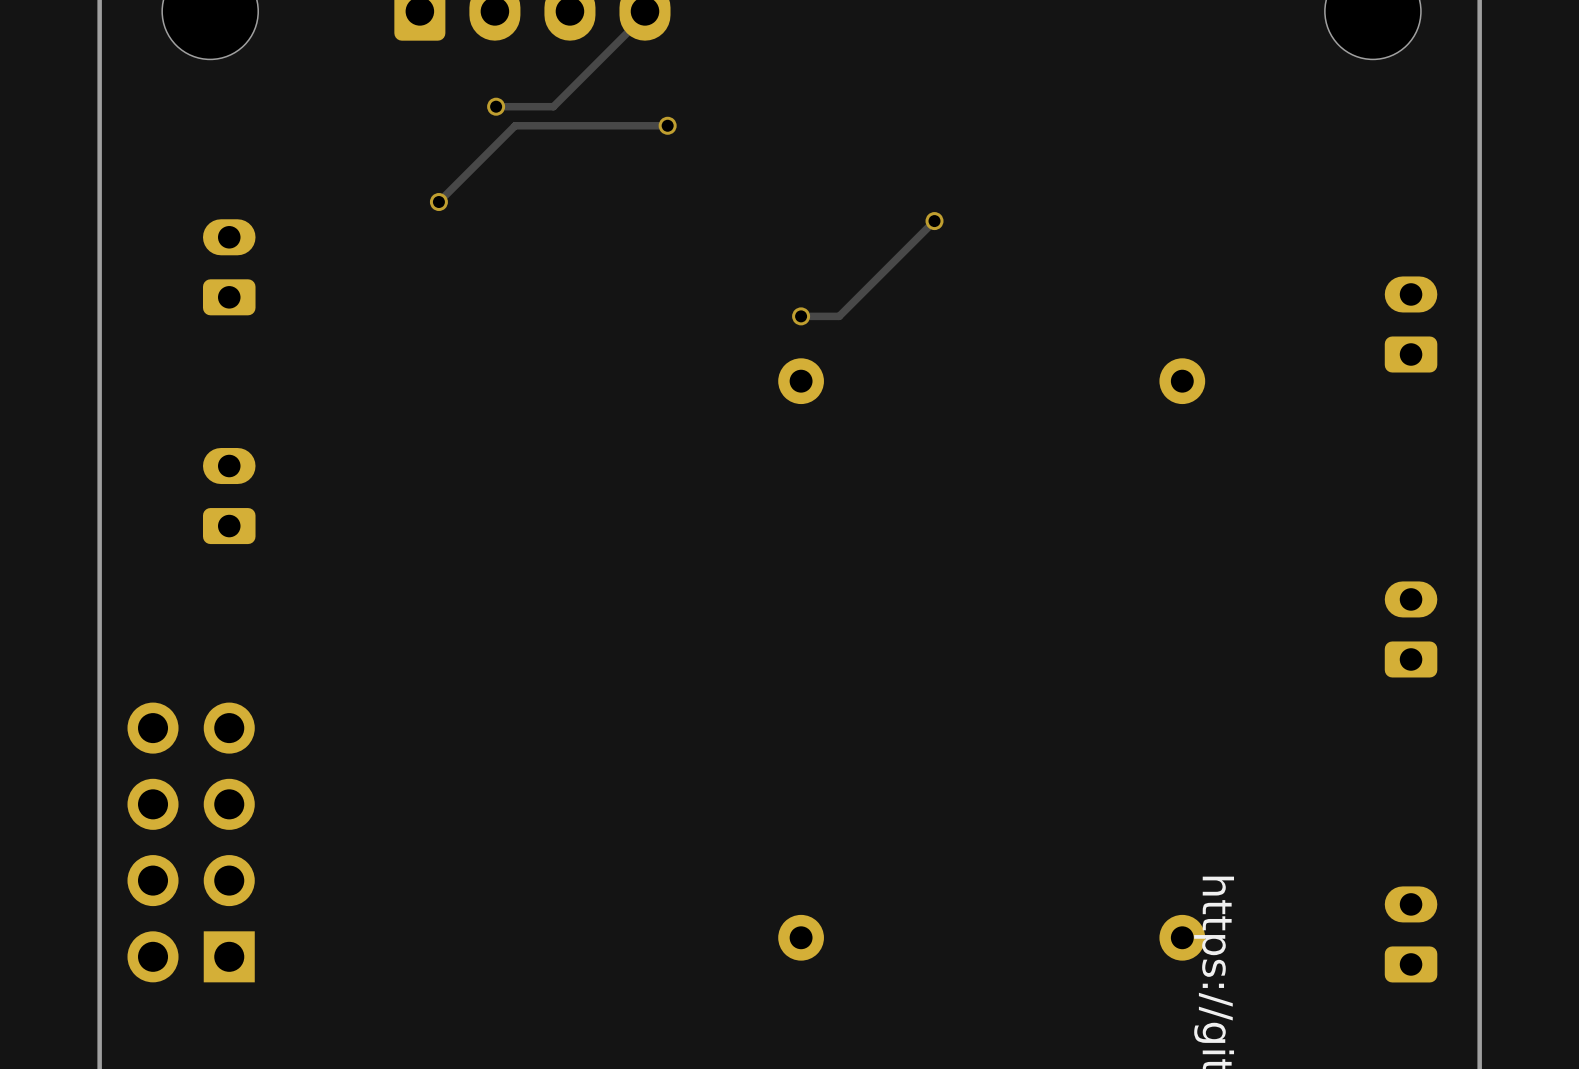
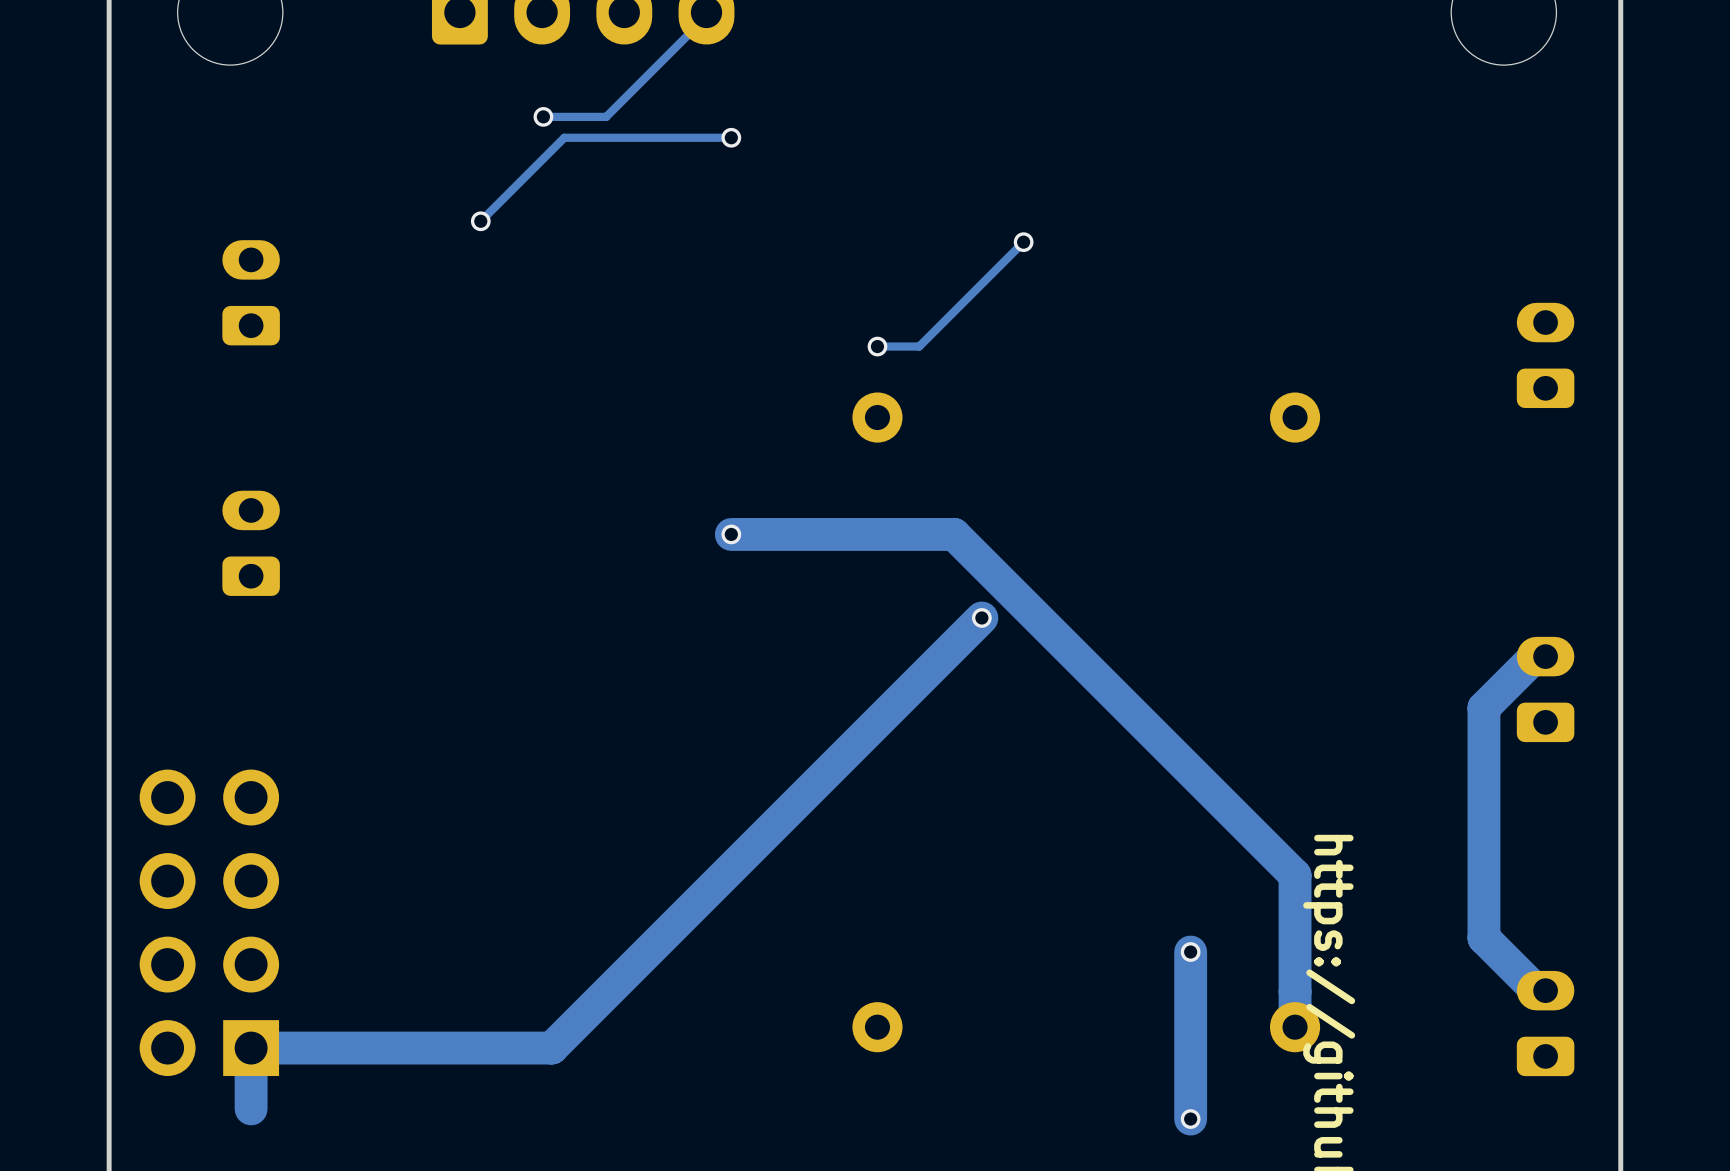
track: none -> (731, 534) (954, 534) (1295, 875) (1295, 1027)
via: none -> (731, 534)
track: none -> (981, 617) (551, 1048) (251, 1048) (251, 1108)
via: none -> (981, 617)
track: none -> (1545, 656) (1535, 656) (1483, 707) (1483, 938) (1536, 990) (1545, 990)
track: none -> (1190, 952) (1190, 1119)
via: none -> (1190, 952)
via: none -> (1190, 1119)

